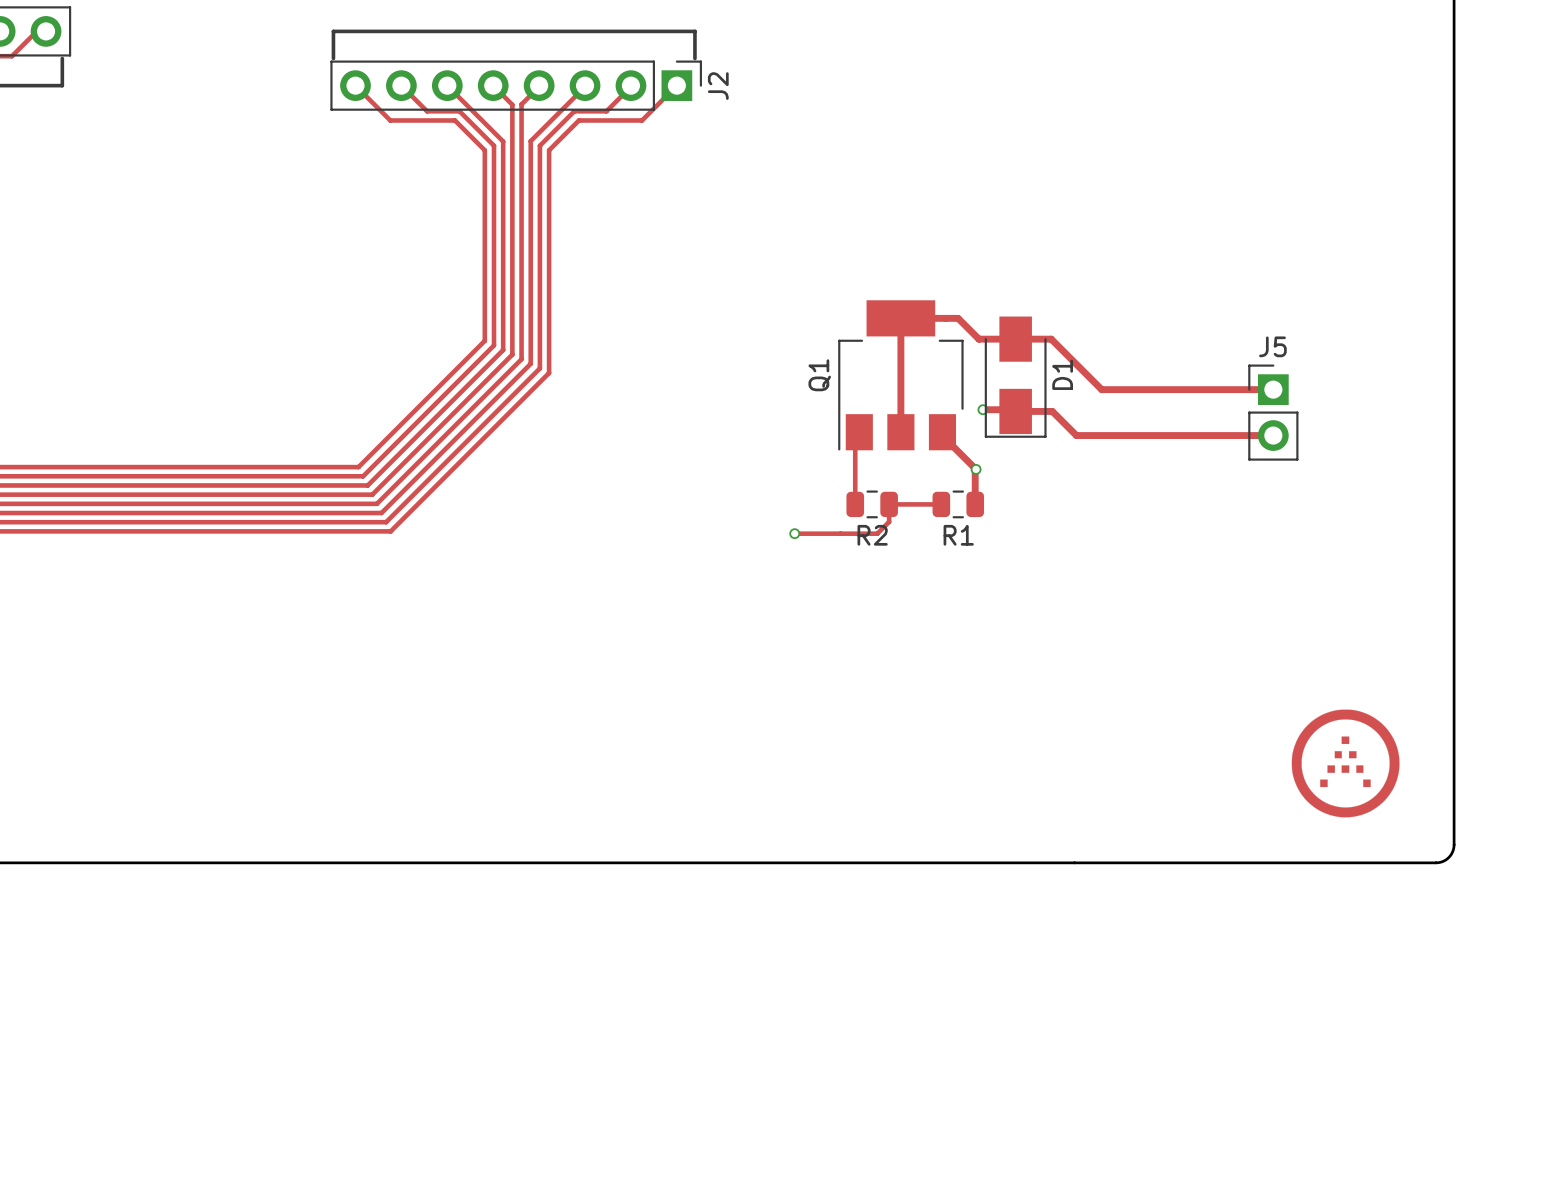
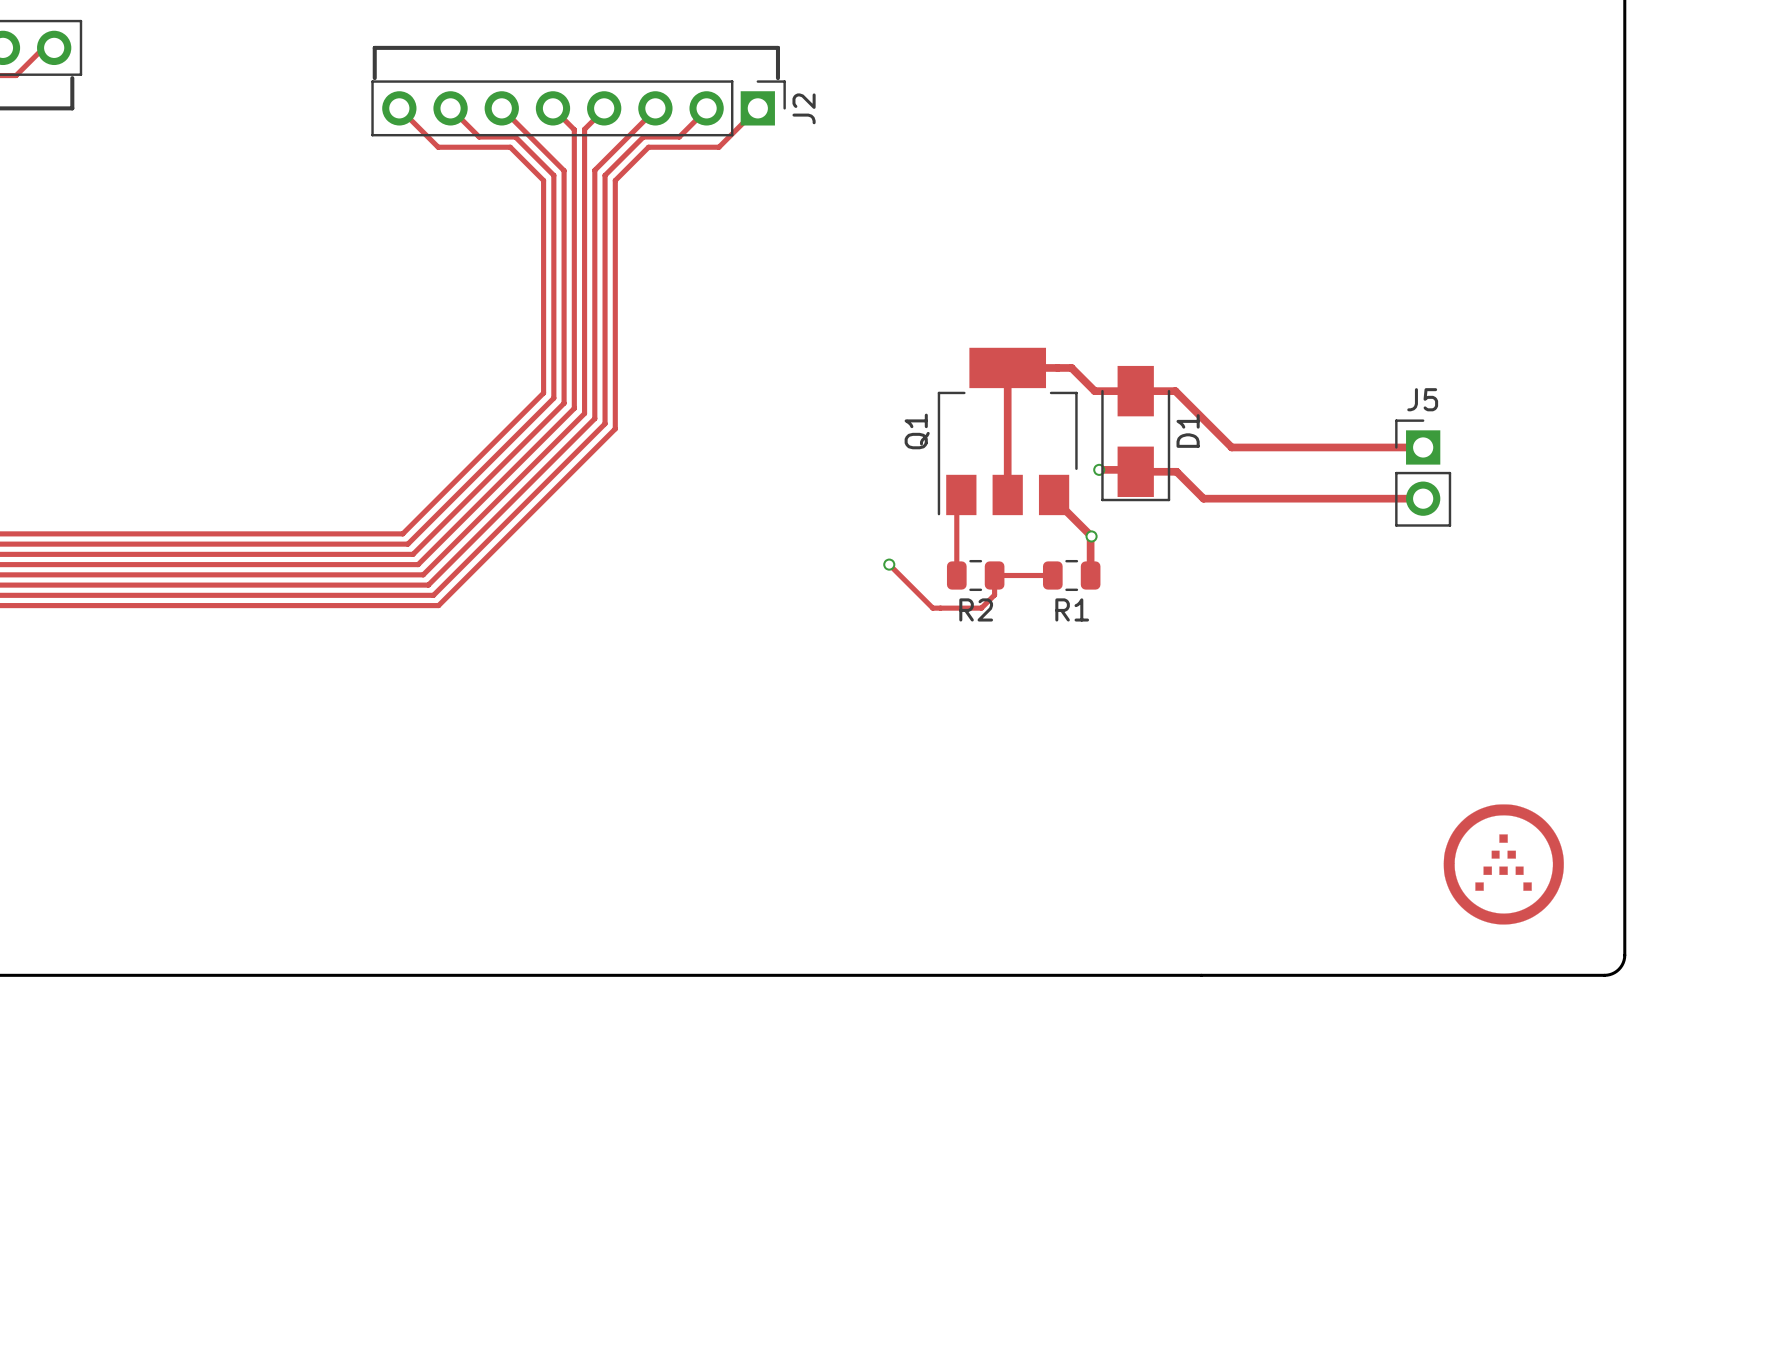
track: (794, 533) (833, 533) -> (889, 564) (932, 608)
via position: (794, 533) -> (889, 564)

